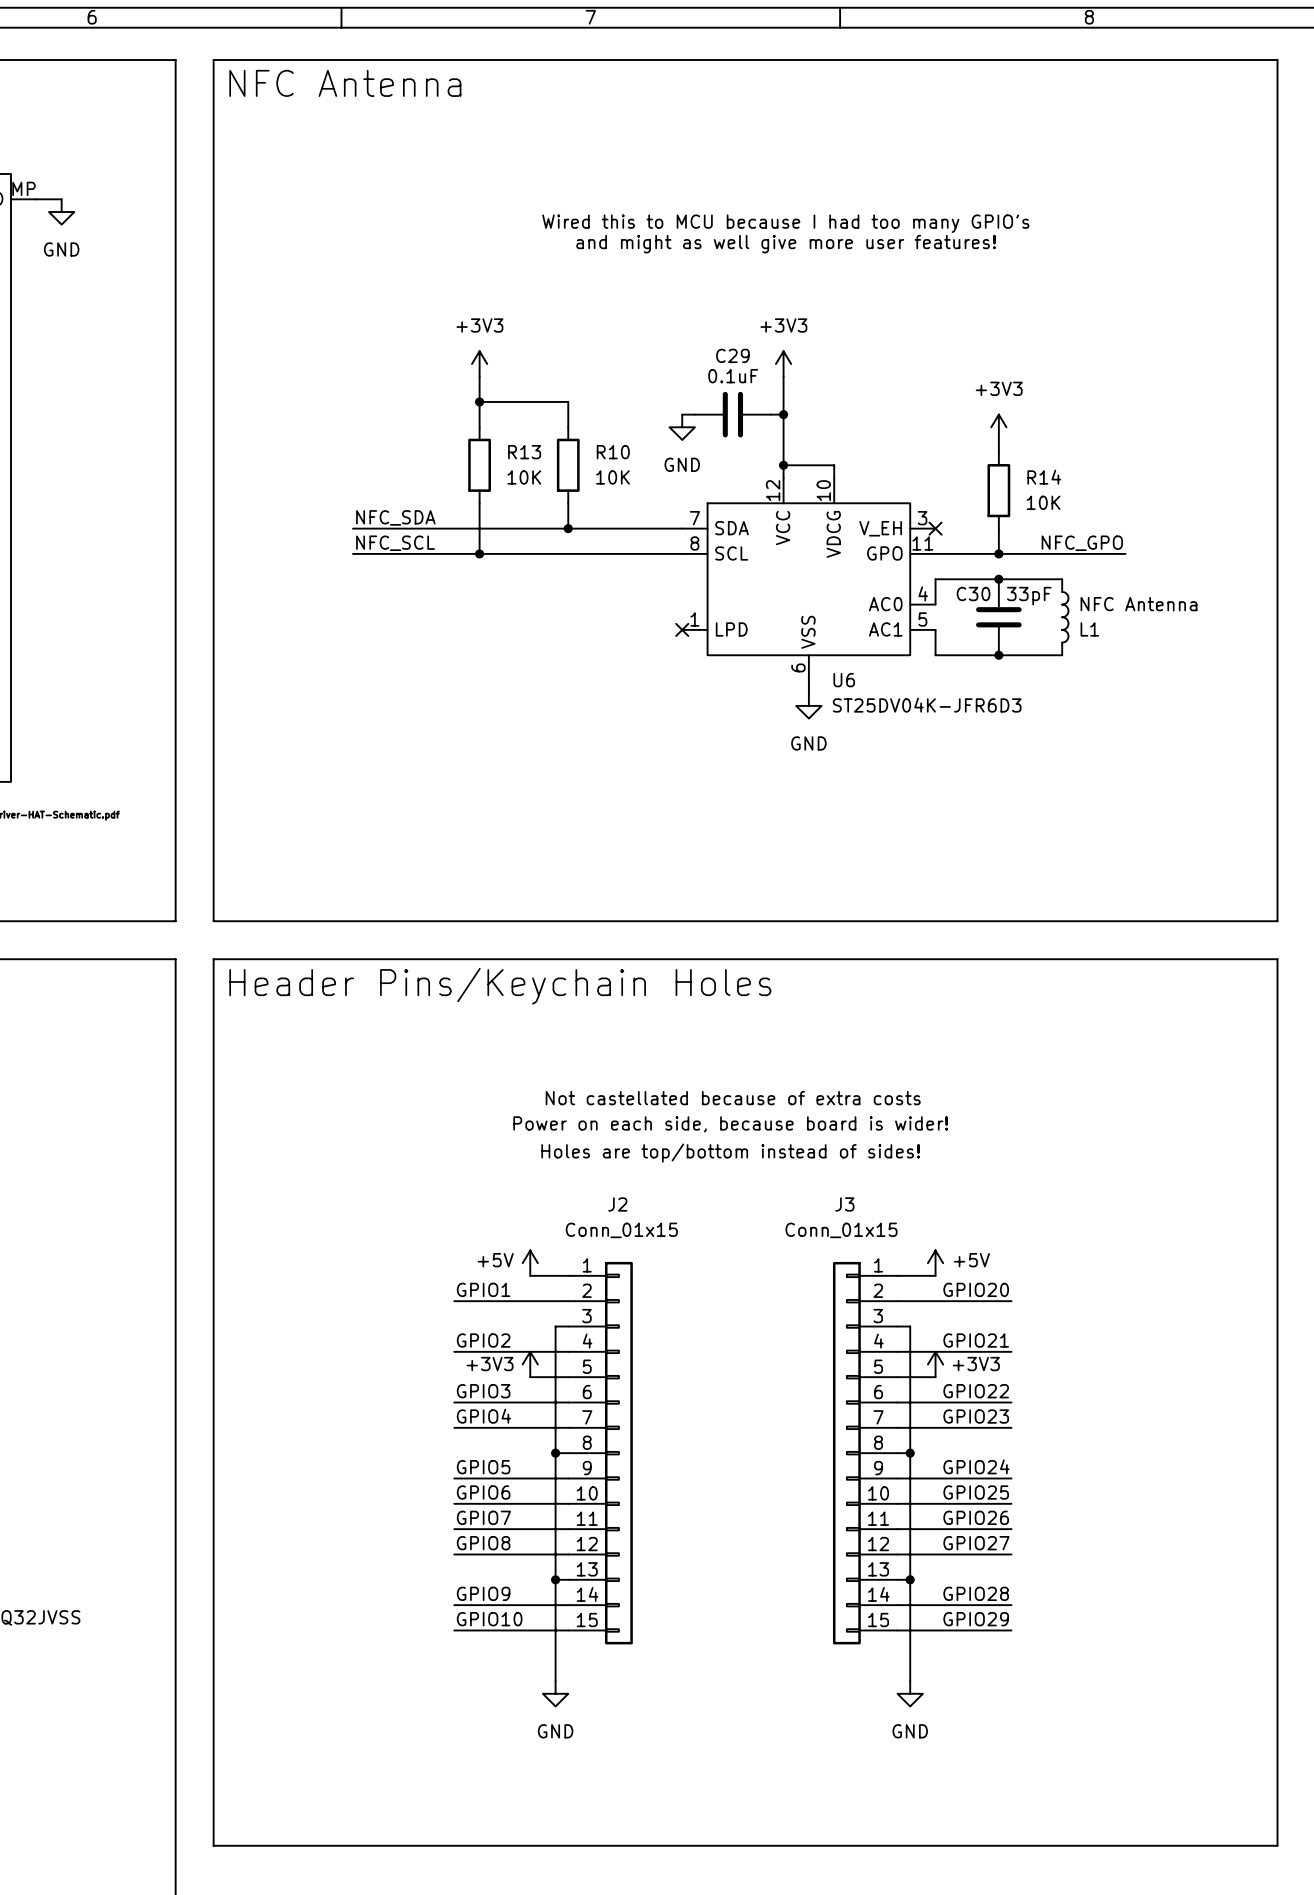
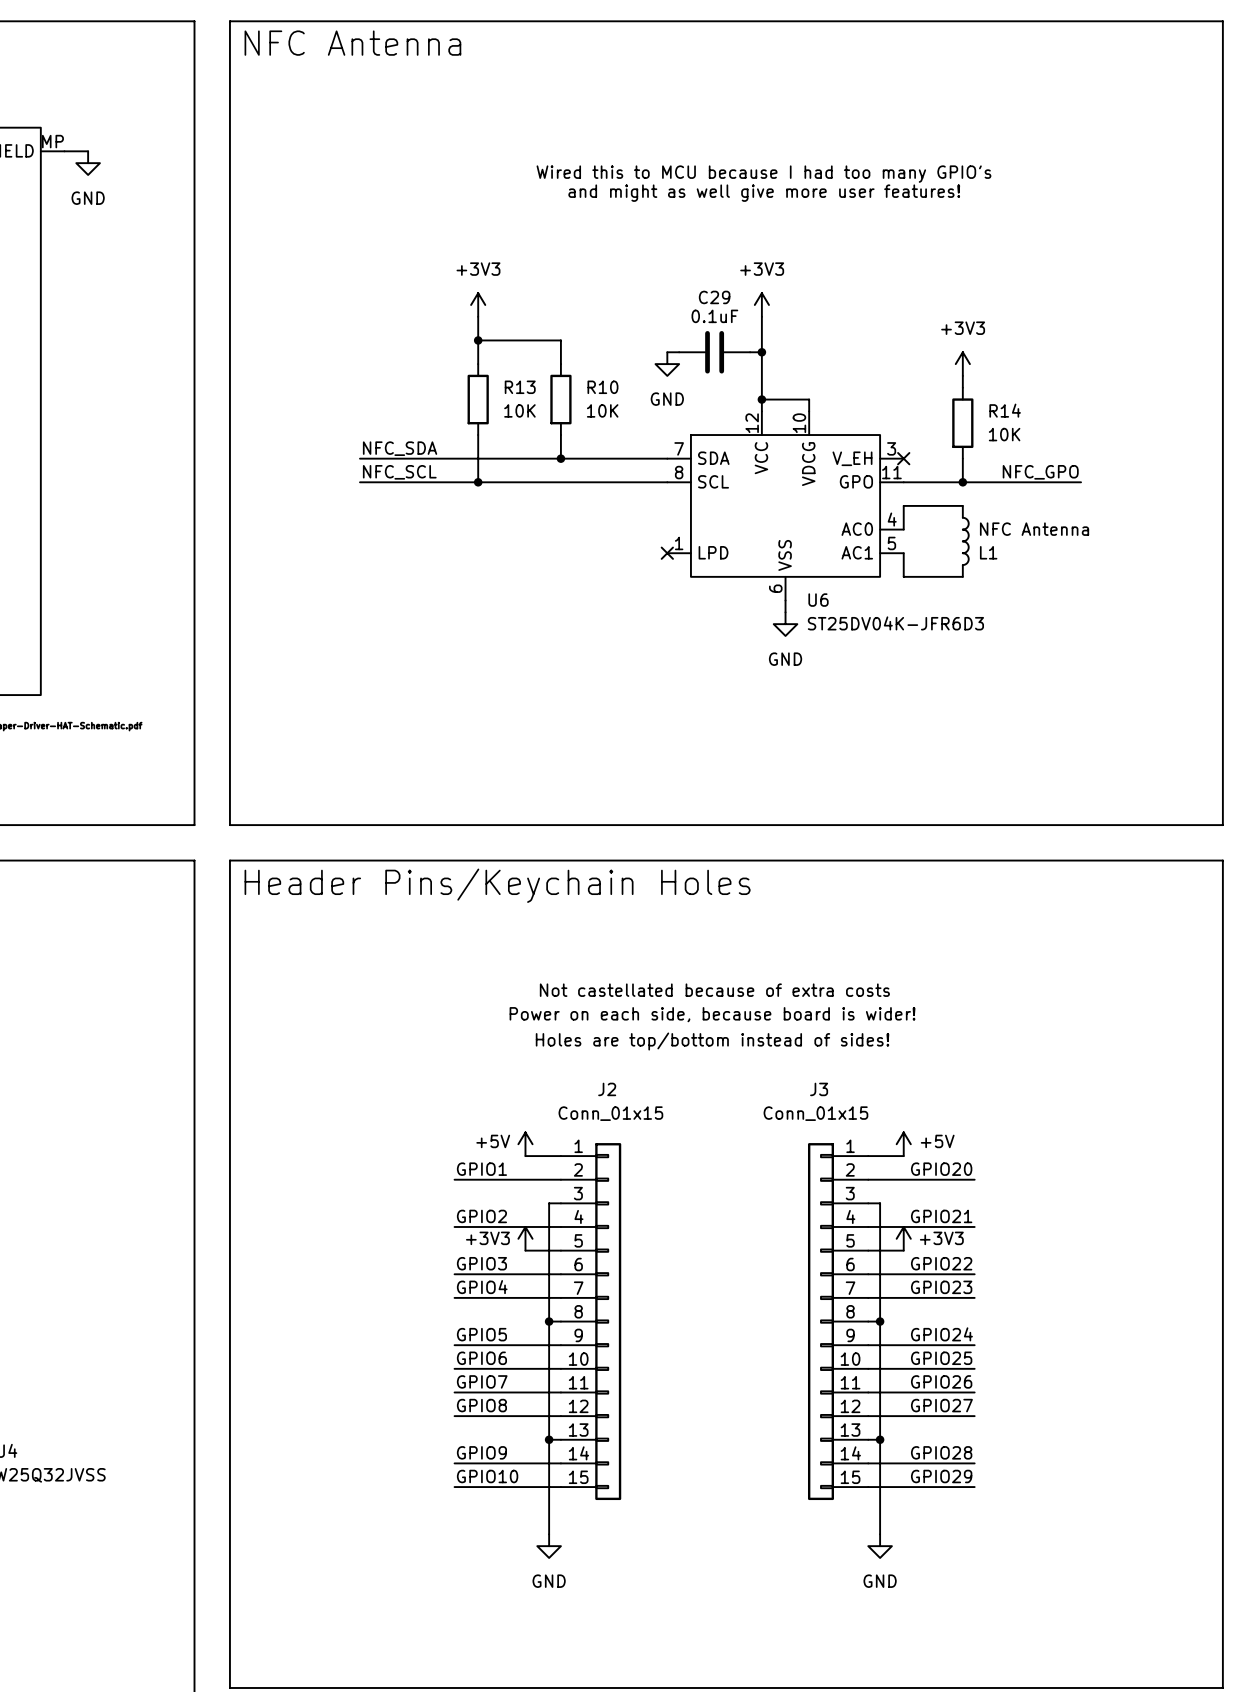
wire: (998, 579) (1062, 579) -> none
junction: (998, 579) -> none
C30: 33pF (998, 617) -> none
L1 position: (1065, 617) -> (965, 541)
wire: (998, 655) (1062, 655) -> none
junction: (998, 655) -> none

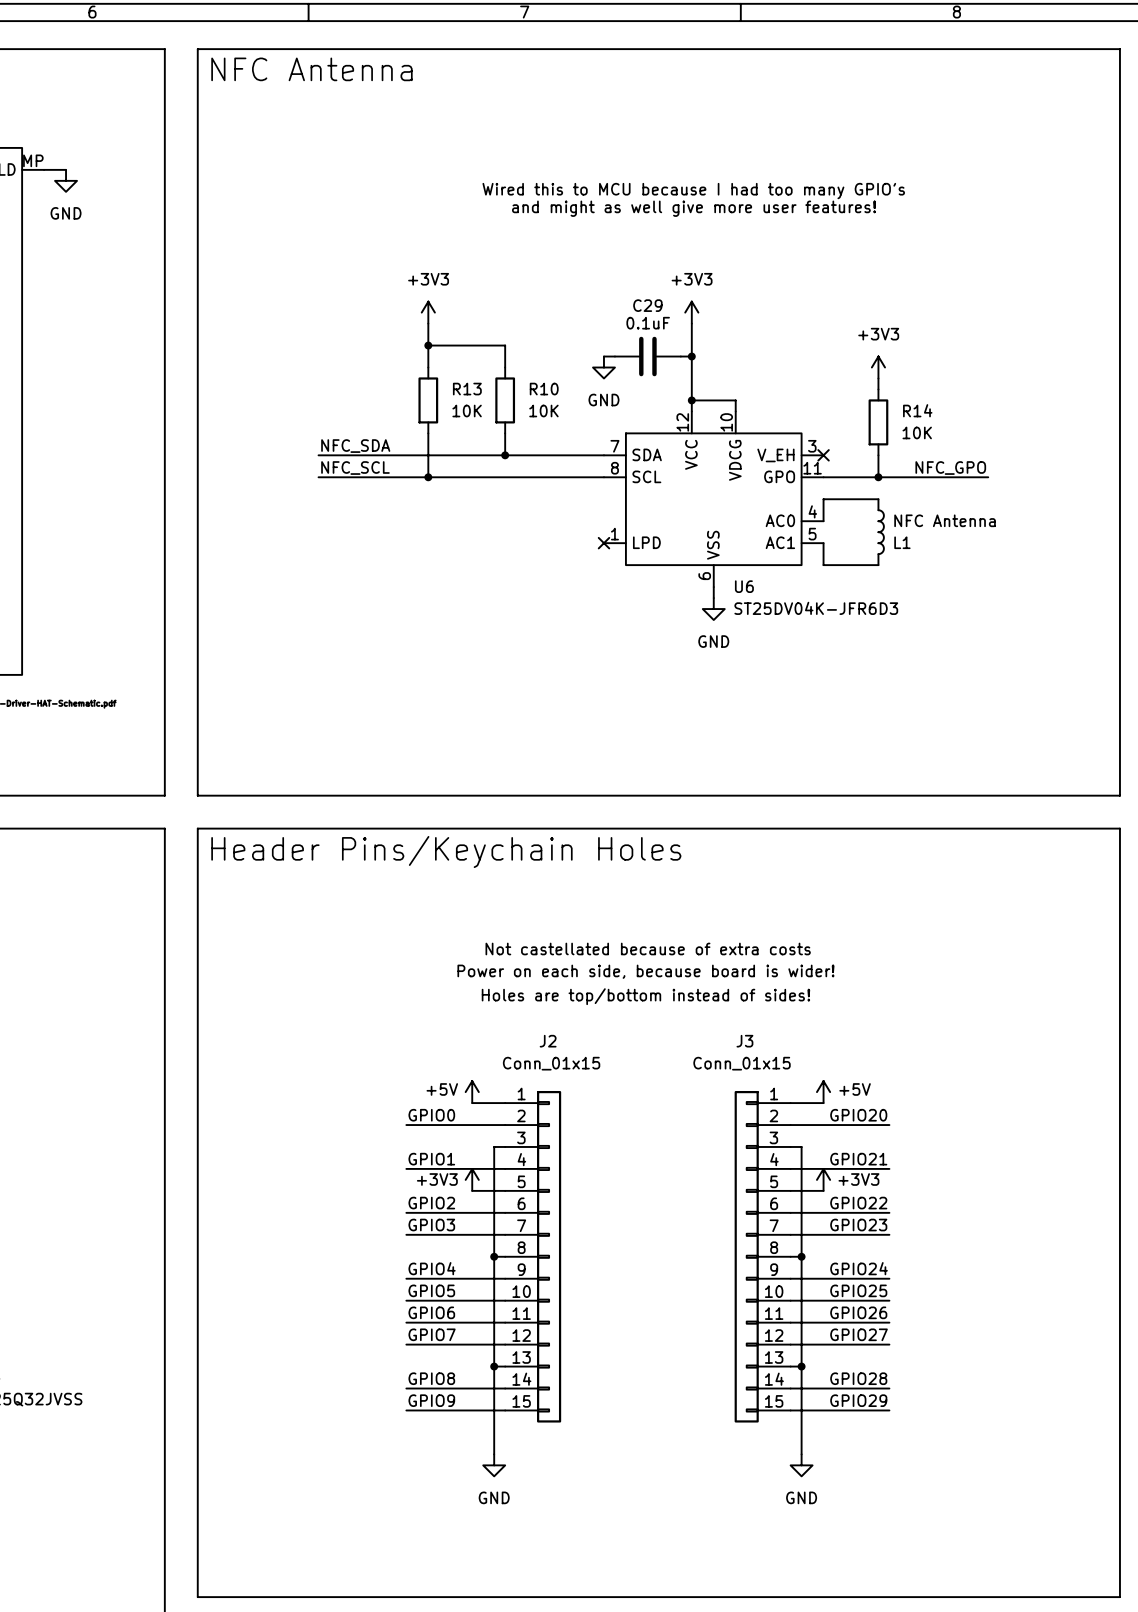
label: GPIO1 (481, 1169) -> GPIO0 (431, 1115)
label: GPIO2 (481, 1216) -> GPIO1 (431, 1159)
label: GPIO3 (481, 1263) -> GPIO2 (431, 1203)
label: GPIO4 (482, 1287) -> GPIO3 (431, 1225)
label: GPIO5 (481, 1334) -> GPIO4 (432, 1268)
label: GPIO6 (481, 1358) -> GPIO5 (431, 1290)
label: GPIO7 (482, 1381) -> GPIO6 (431, 1312)
label: GPIO8 (481, 1405) -> GPIO7 (432, 1334)
label: GPIO9 (481, 1452) -> GPIO8 (431, 1378)
label: GPIO10 (487, 1476) -> GPIO9 (431, 1400)

